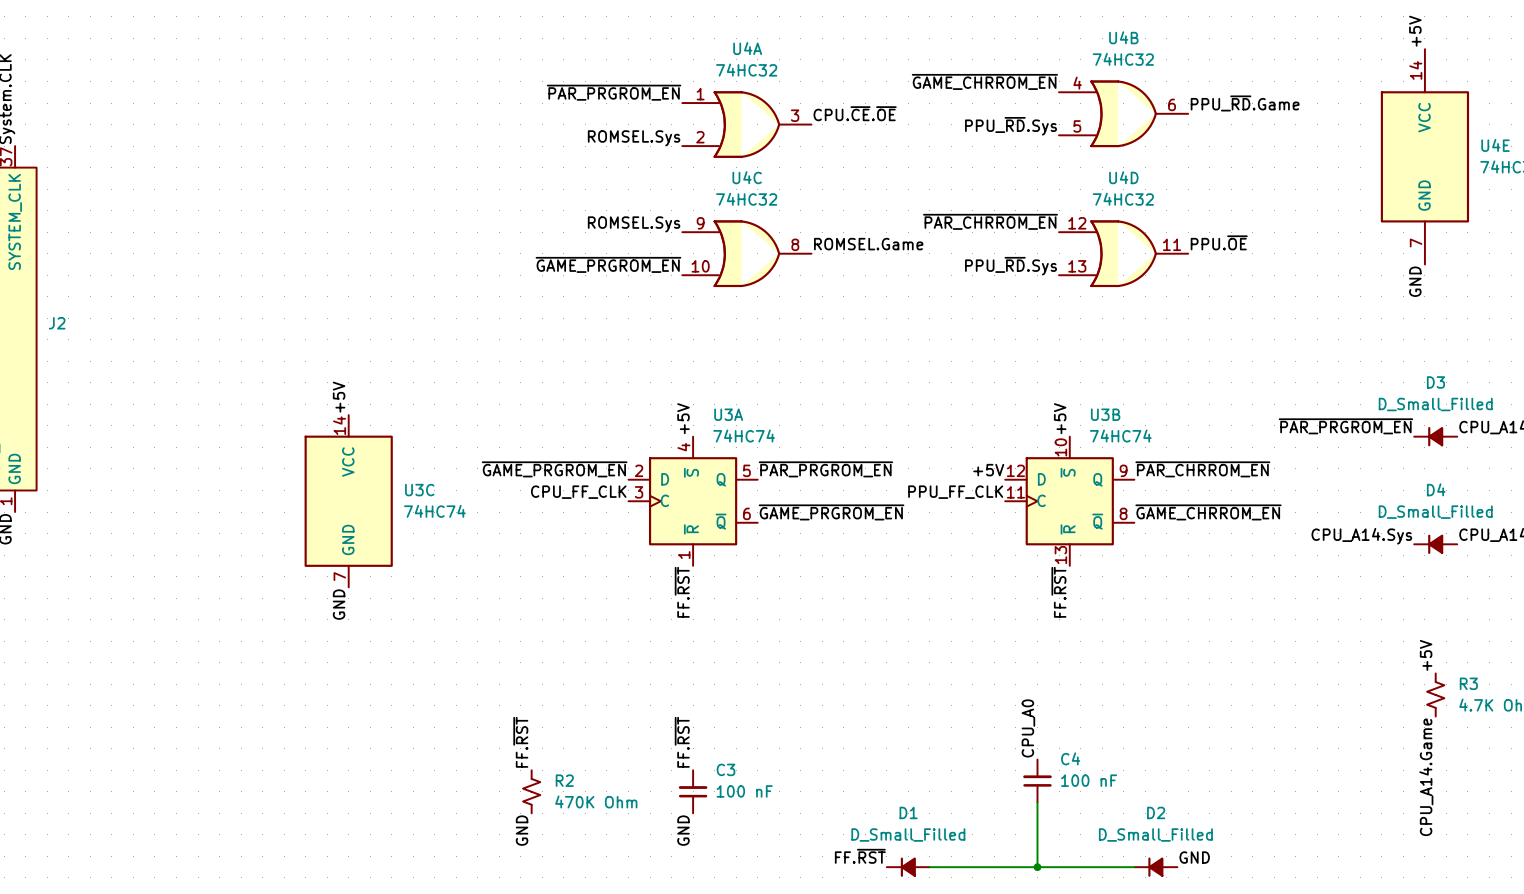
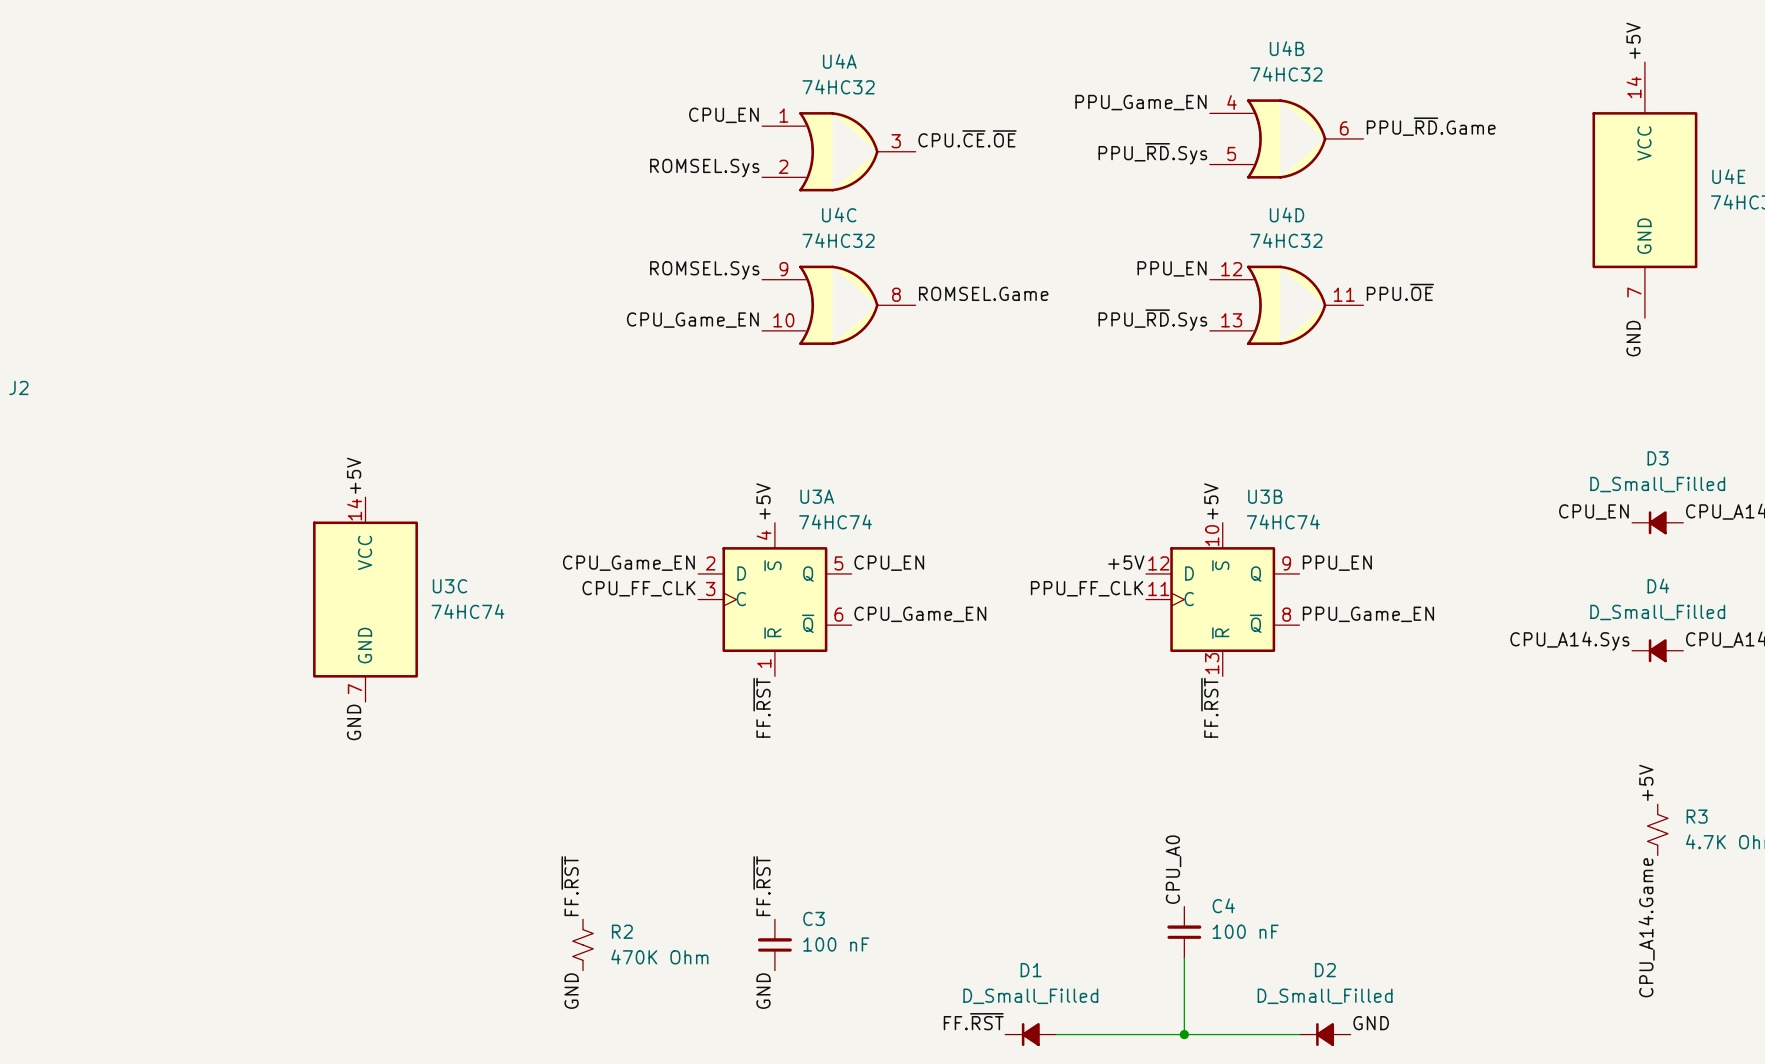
label: ~{GAME_CHRROM_EN} (984, 81) -> PPU_Game_EN (1140, 102)
label: ~{PAR_PRGROM_EN} (614, 92) -> CPU_EN (723, 115)
label: ~{PAR_CHRROM_EN} (990, 221) -> PPU_EN (1172, 268)
label: ~{GAME_PRGROM_EN} (608, 264) -> CPU_Game_EN (692, 320)
label: ~{PAR_PRGROM_EN} (1345, 426) -> CPU_EN (1593, 511)
label: ~{GAME_PRGROM_EN} (554, 469) -> CPU_Game_EN (628, 563)
label: ~{PAR_PRGROM_EN} (825, 469) -> CPU_EN (889, 563)
label: ~{PAR_CHRROM_EN} (1202, 469) -> PPU_EN (1337, 563)
label: ~{GAME_PRGROM_EN} (831, 512) -> CPU_Game_EN (920, 614)
label: ~{GAME_CHRROM_EN} (1208, 512) -> PPU_Game_EN (1368, 614)

